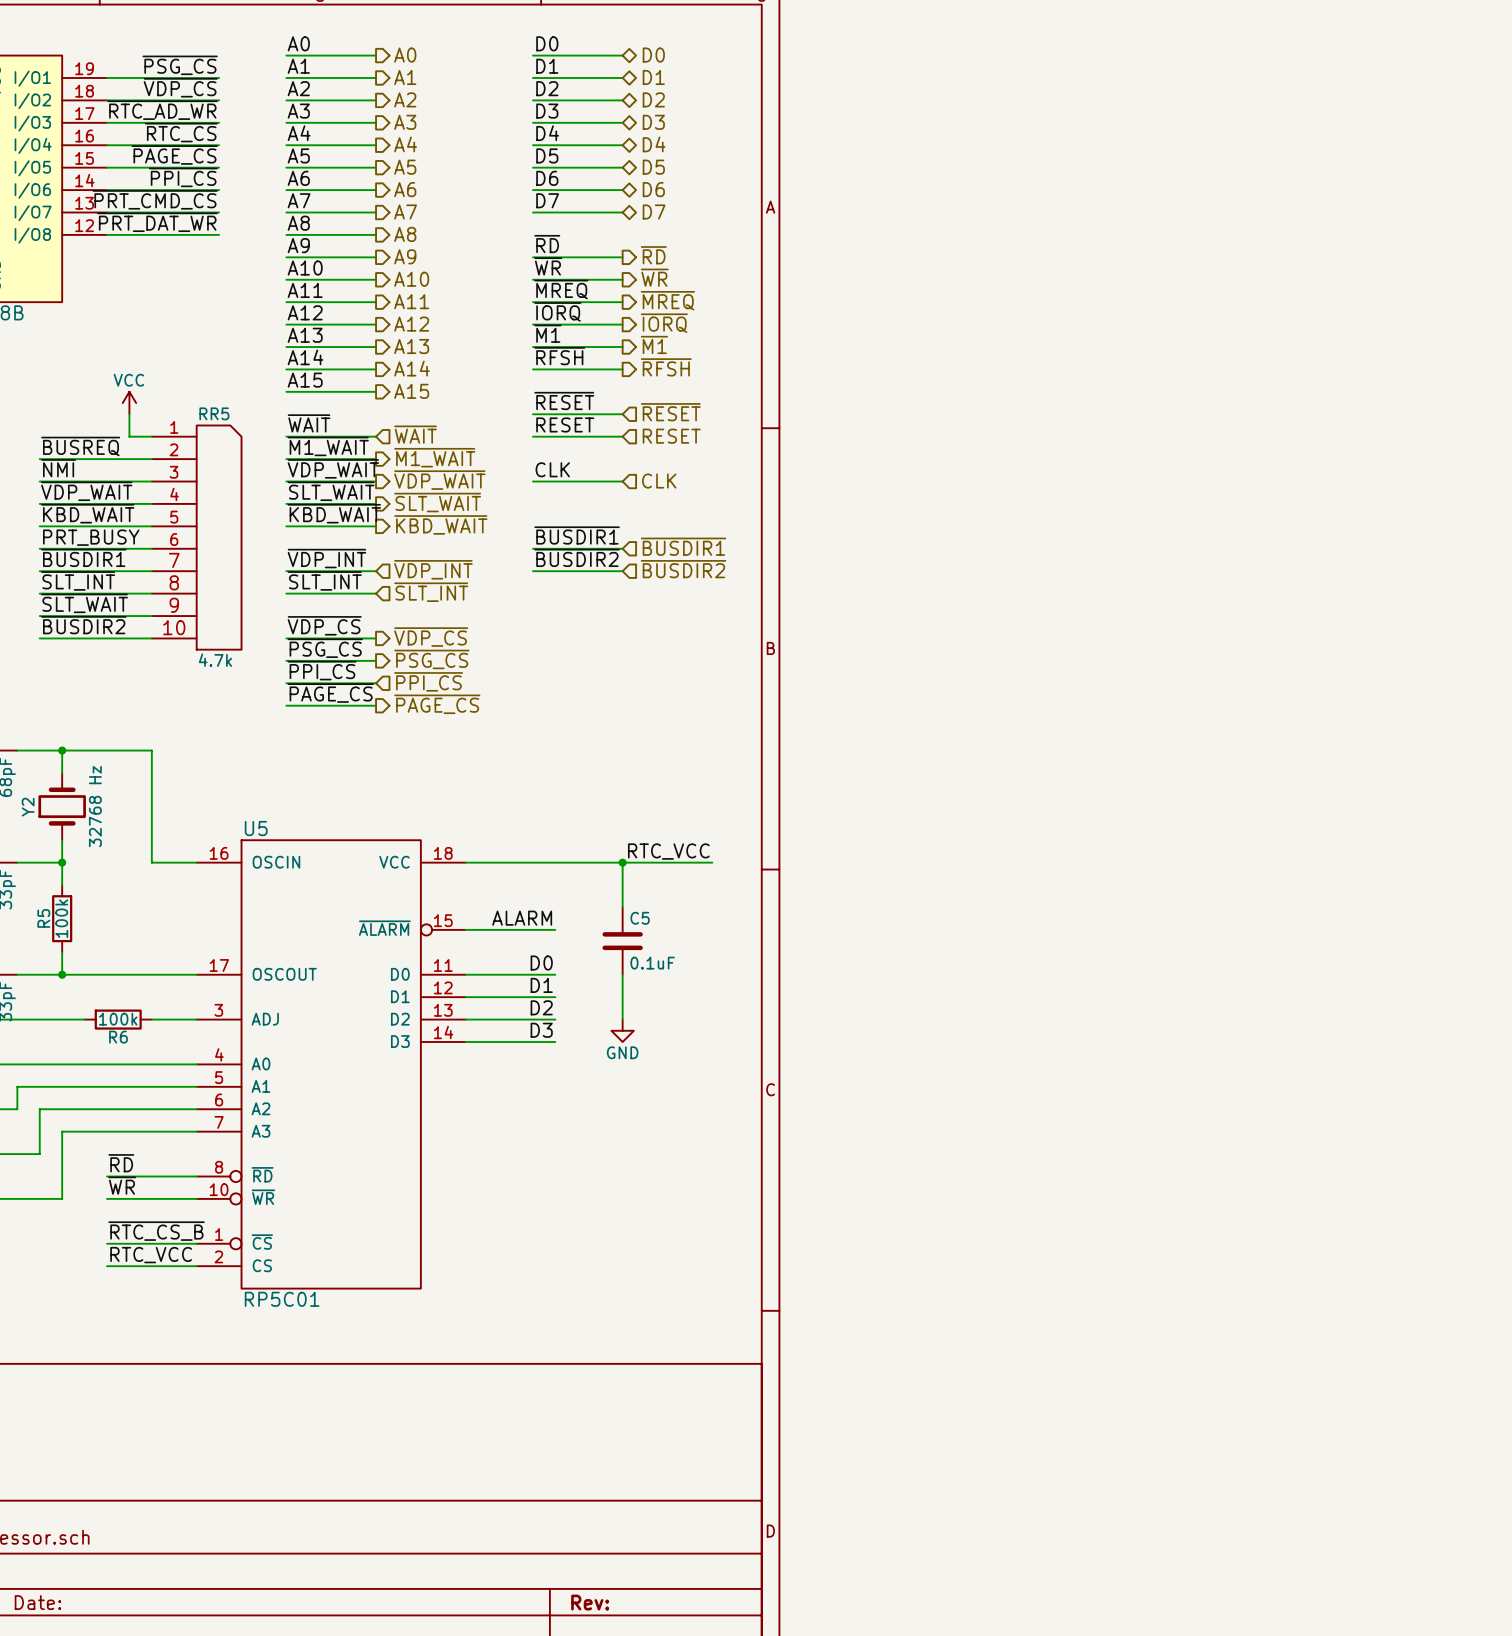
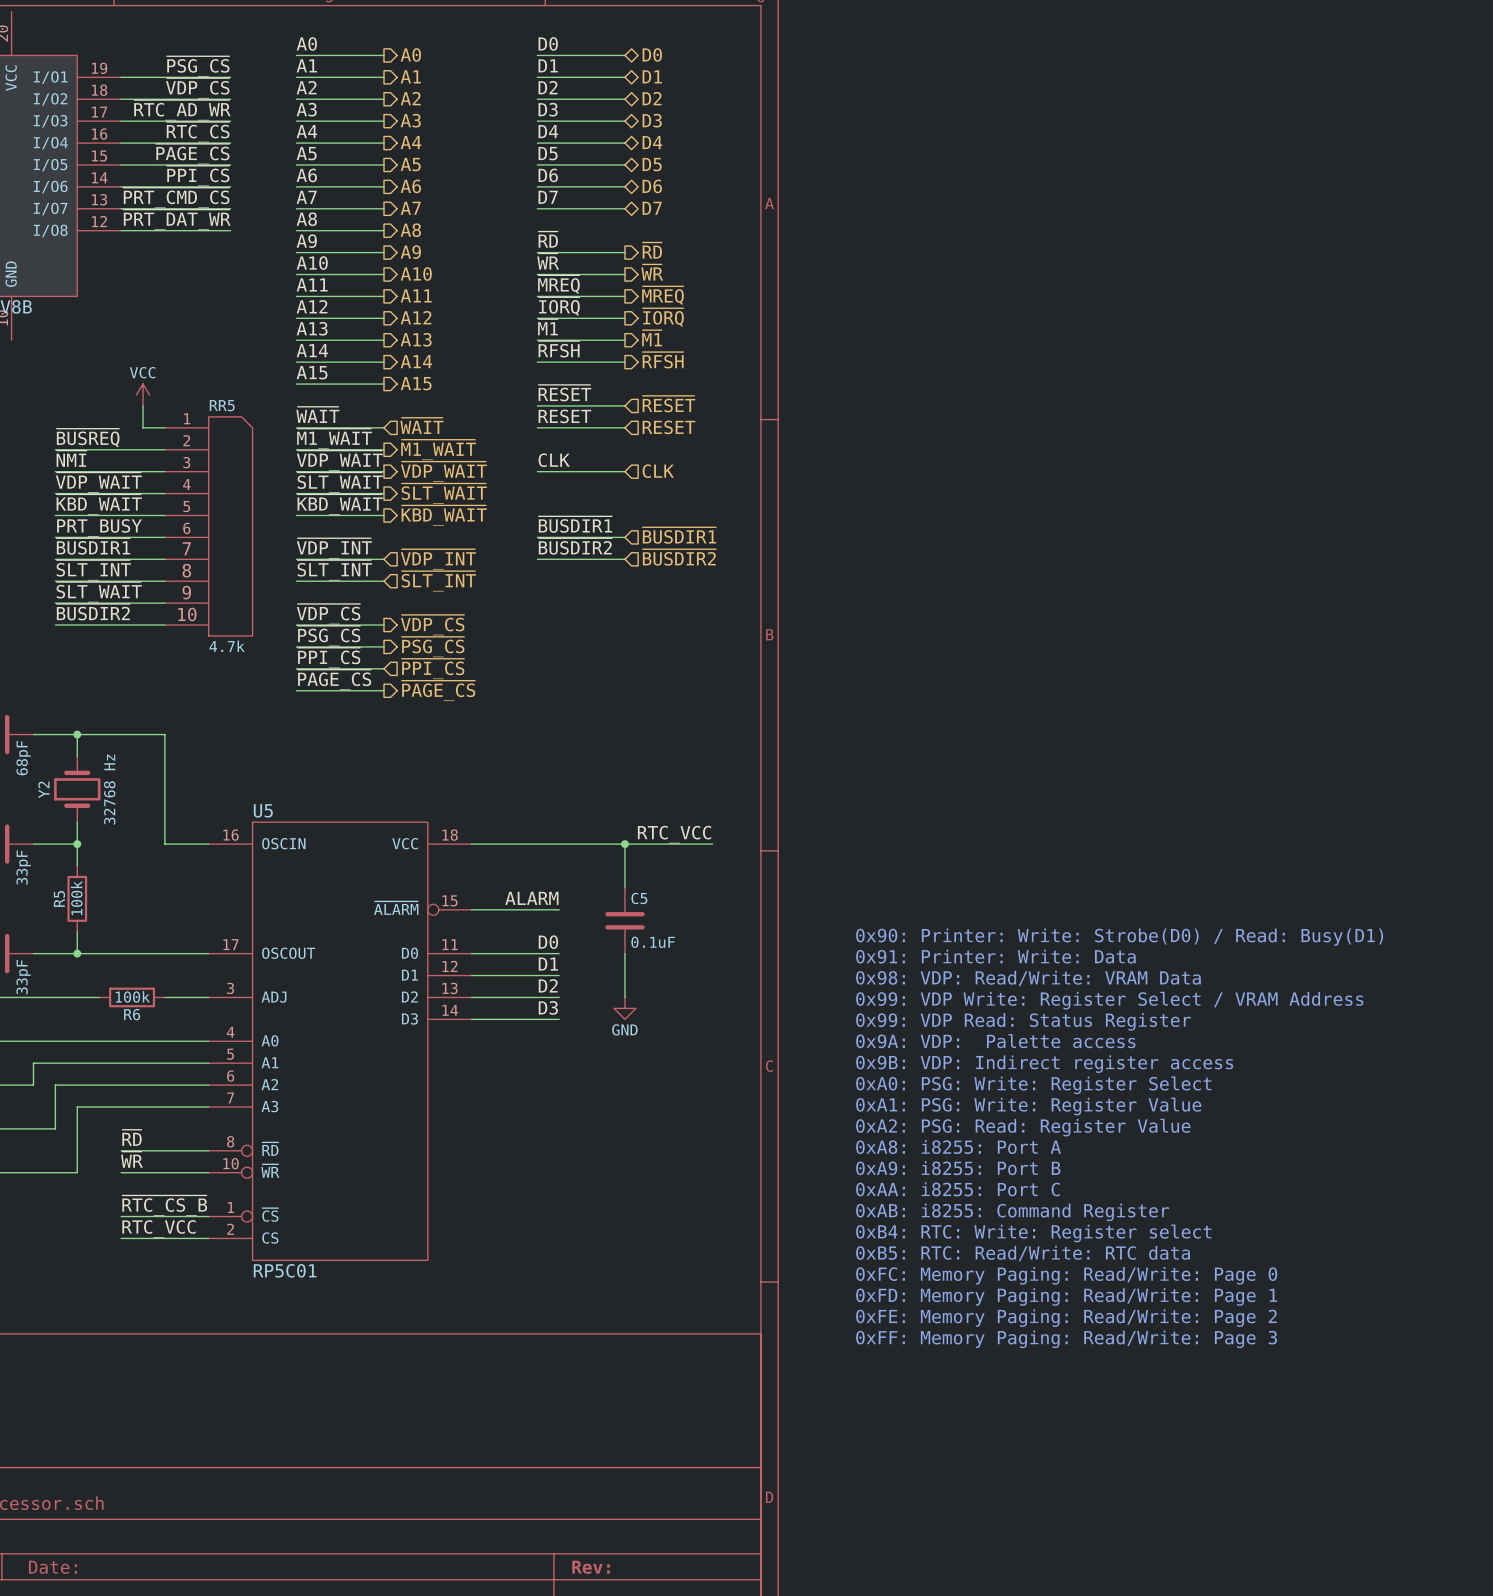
text: none -> 0x90: Printer: Write: Strobe(D0) / Read: Busy(D1) (1119, 937)
text: none -> 0x91: Printer: Write: Data (995, 956)
text: none -> 0x98: VDP: Read/Write: VRAM Data (1028, 978)
text: none -> 0x99: VDP Write: Register Select / VRAM Address (1109, 1000)
text: none -> 0x99: VDP Read: Status Register (1023, 1021)
text: none -> 0x9A: VDP: Palette access (995, 1041)
text: none -> 0x9B: VDP: Indirect register access (1044, 1064)
text: none -> 0xA0: PSG: Write: Register Select (1033, 1085)
text: none -> 0xA1: PSG: Write: Register Value (1028, 1106)
text: none -> 0xA2: PSG: Read: Register Value (1023, 1127)
text: none -> 0xA8: i8255: Port A (958, 1147)
text: none -> 0xA9: i8255: Port B (958, 1168)
text: none -> 0xAA: i8255: Port C (958, 1189)
text: none -> 0xAB: i8255: Command Register (1012, 1212)
text: none -> 0xB4: RTC: Write: Register select (1033, 1233)
text: none -> 0xB5: RTC: Read/Write: RTC data (1023, 1253)
text: none -> 0xFC: Memory Paging: Read/Write: Page 0 (1066, 1275)
text: none -> 0xFD: Memory Paging: Read/Write: Page 1 (1066, 1296)
text: none -> 0xFE: Memory Paging: Read/Write: Page 2 (1066, 1318)
text: none -> 0xFF: Memory Paging: Read/Write: Page 3 (1066, 1339)

